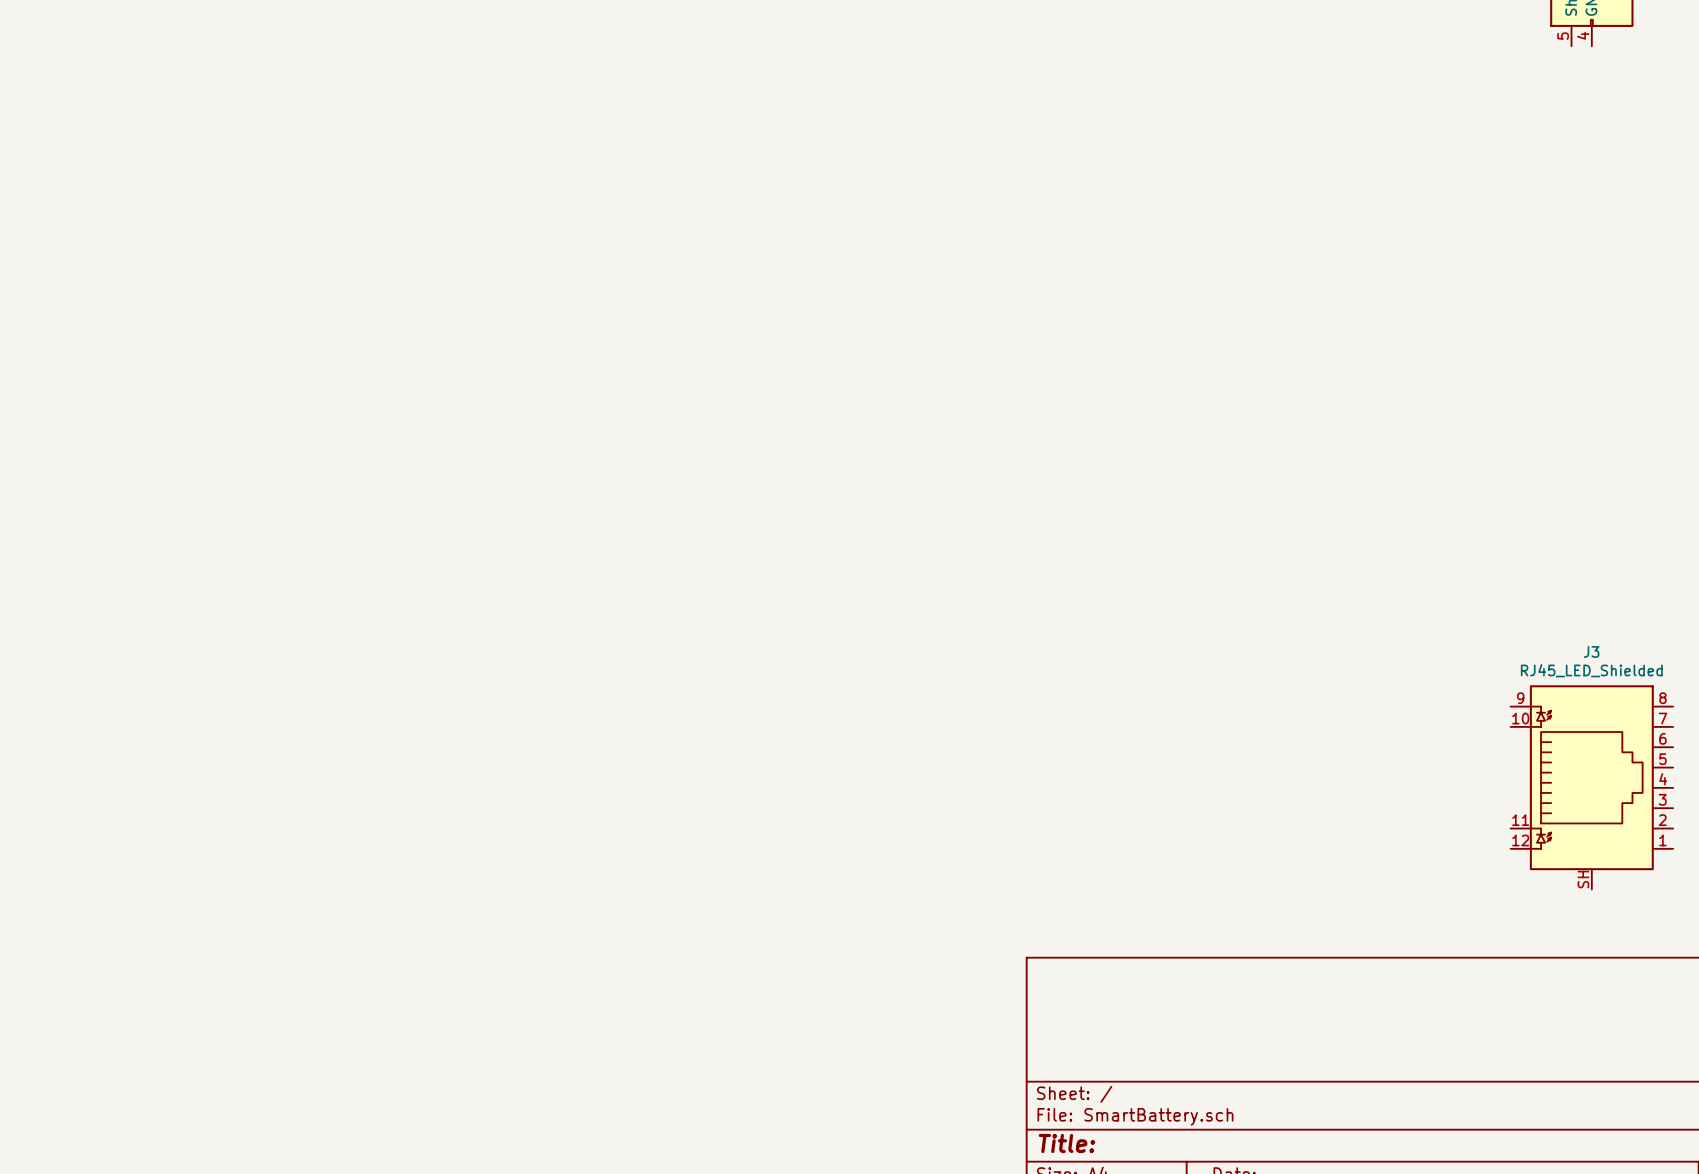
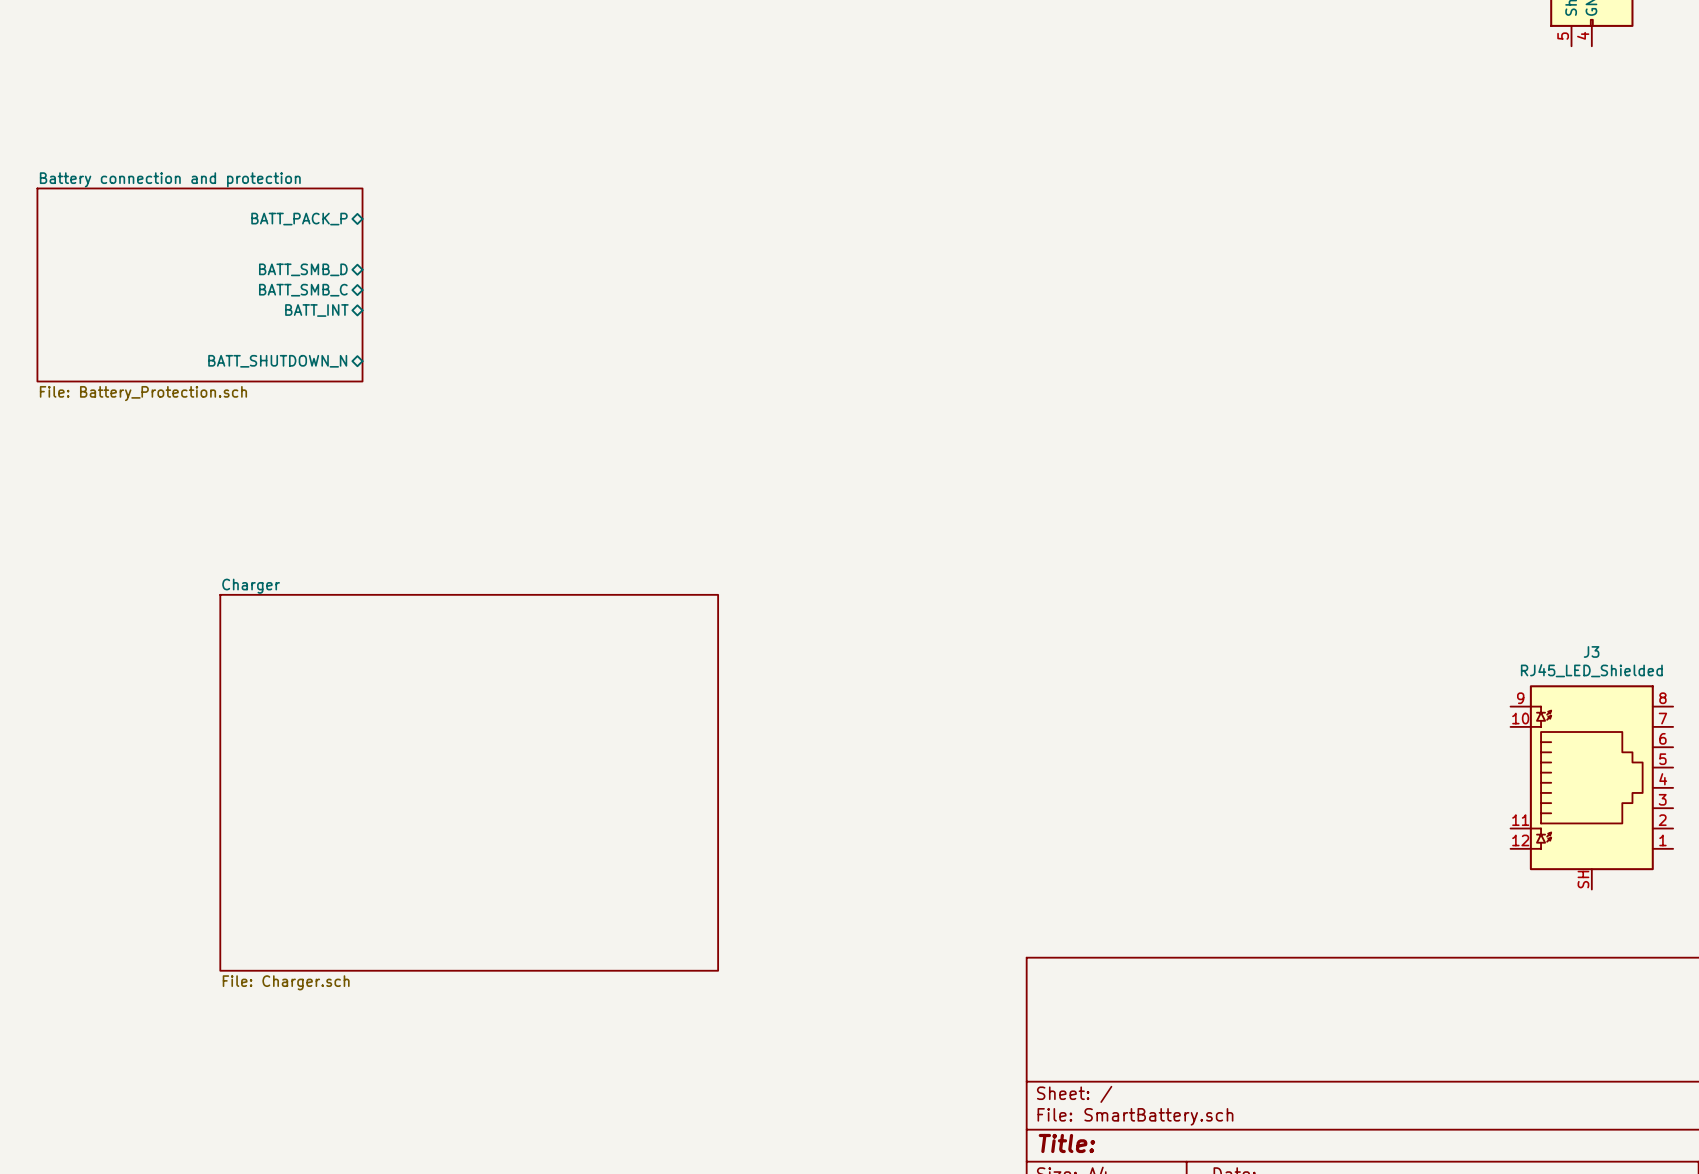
sheet pin: none -> BATT_PACK_P (299, 219)
sheet pin: none -> BATT_SMB_D (303, 269)
sheet Battery connection and protection: none -> File: Battery_Protection.sch (199, 284)
sheet pin: none -> BATT_SMB_C (303, 290)
sheet pin: none -> BATT_INT (316, 310)
sheet pin: none -> BATT_SHUTDOWN_N (277, 361)
sheet Charger: none -> File: Charger.sch (469, 782)

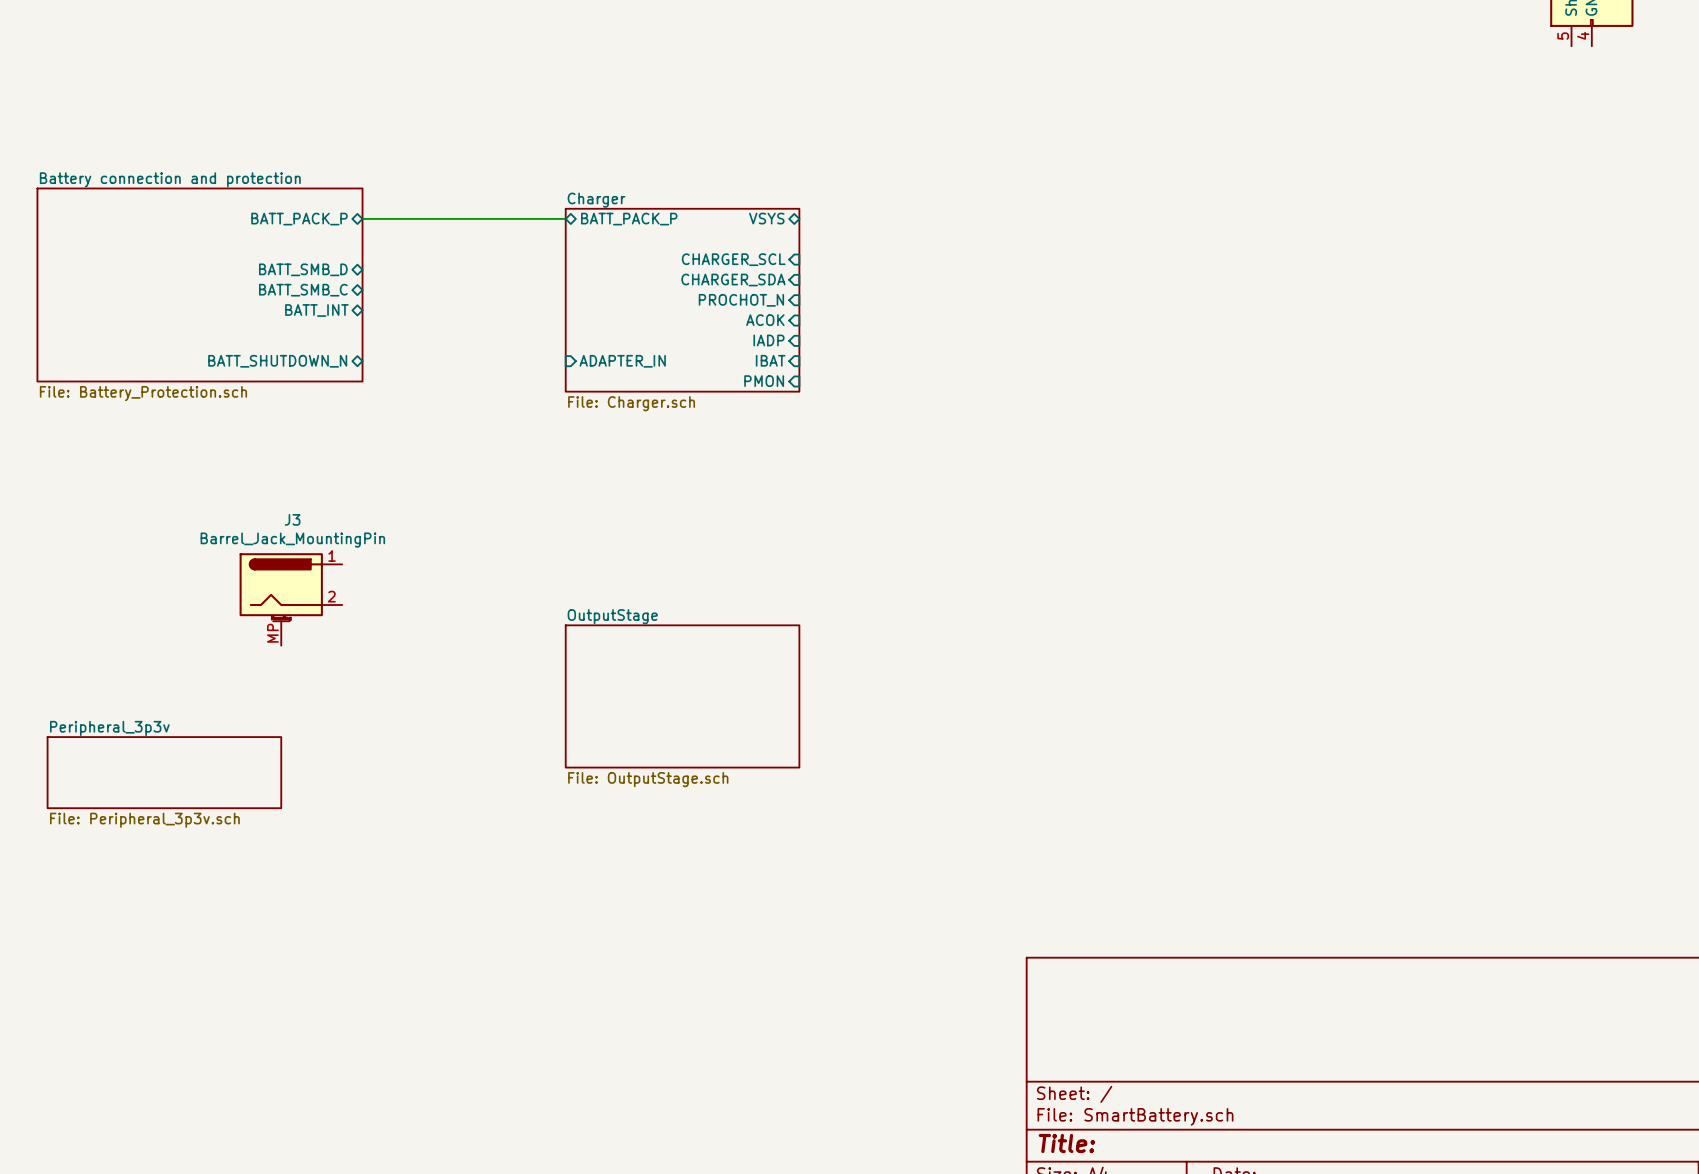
wire: none -> (362, 218) (565, 218)
sheet pin: none -> VSYS (766, 218)
sheet pin: none -> BATT_PACK_P (629, 219)
sheet pin: none -> CHARGER_SCL (733, 259)
sheet pin: none -> CHARGER_SDA (733, 280)
sheet Charger: none -> File: Charger.sch (682, 300)
sheet pin: none -> PROCHOT_N (741, 300)
sheet pin: none -> ACOK (765, 320)
sheet pin: none -> IADP (768, 340)
sheet pin: none -> IBAT (770, 360)
sheet pin: none -> ADAPTER_IN (622, 361)
sheet pin: none -> PMON (764, 381)
J3 name position: J3 (1591, 651) -> J3 (292, 519)
J3 value: RJ45_LED_Shielded (1591, 670) -> Barrel_Jack_MountingPin (292, 540)
J3 symbol: [1510, 685, 1674, 890] -> [239, 553, 343, 646]
sheet OutputStage: none -> File: OutputStage.sch (682, 696)
sheet Peripheral_3p3v: none -> File: Peripheral_3p3v.sch (164, 772)
sheet Charger: File: Charger.sch (469, 782) -> none

